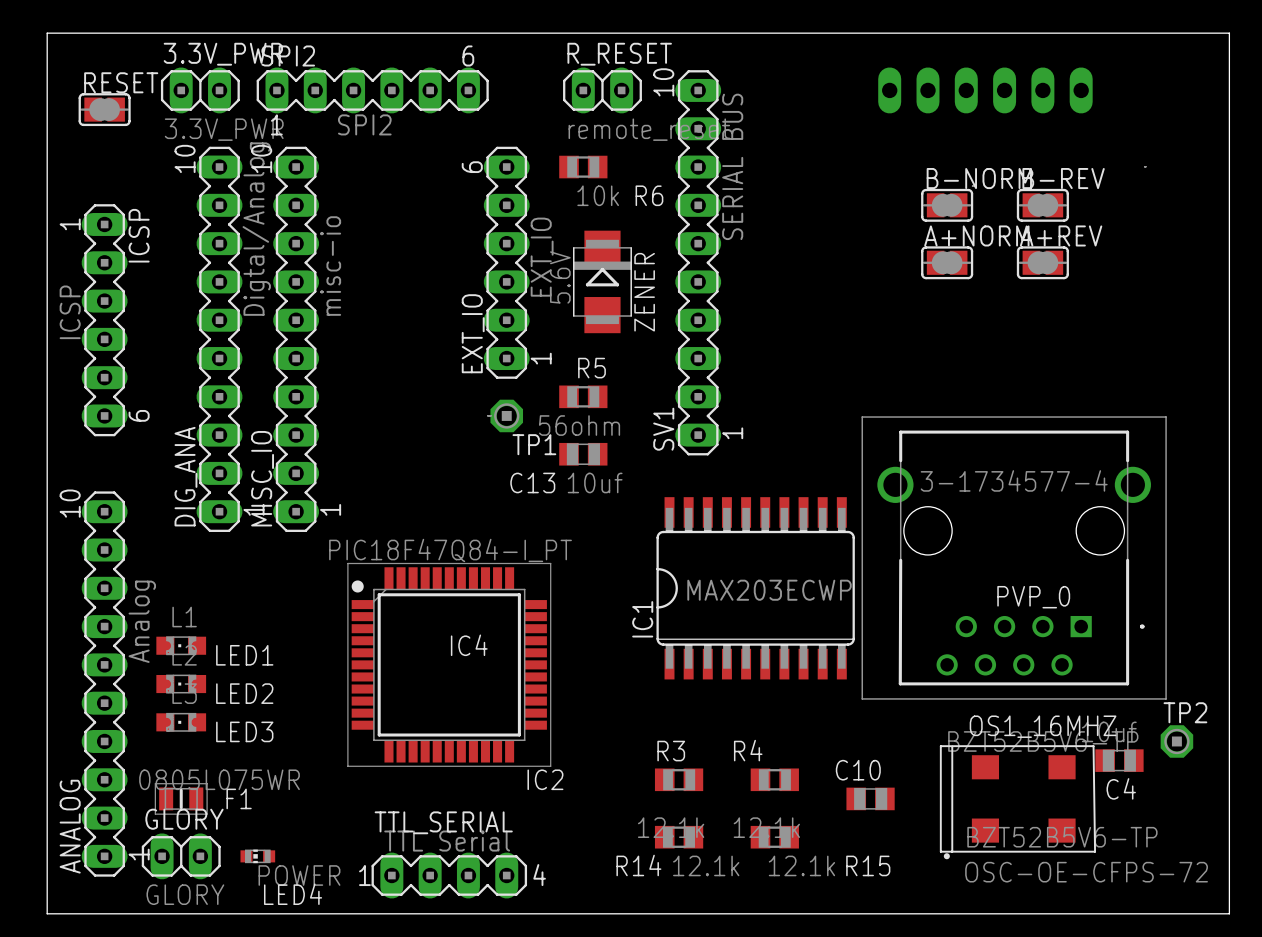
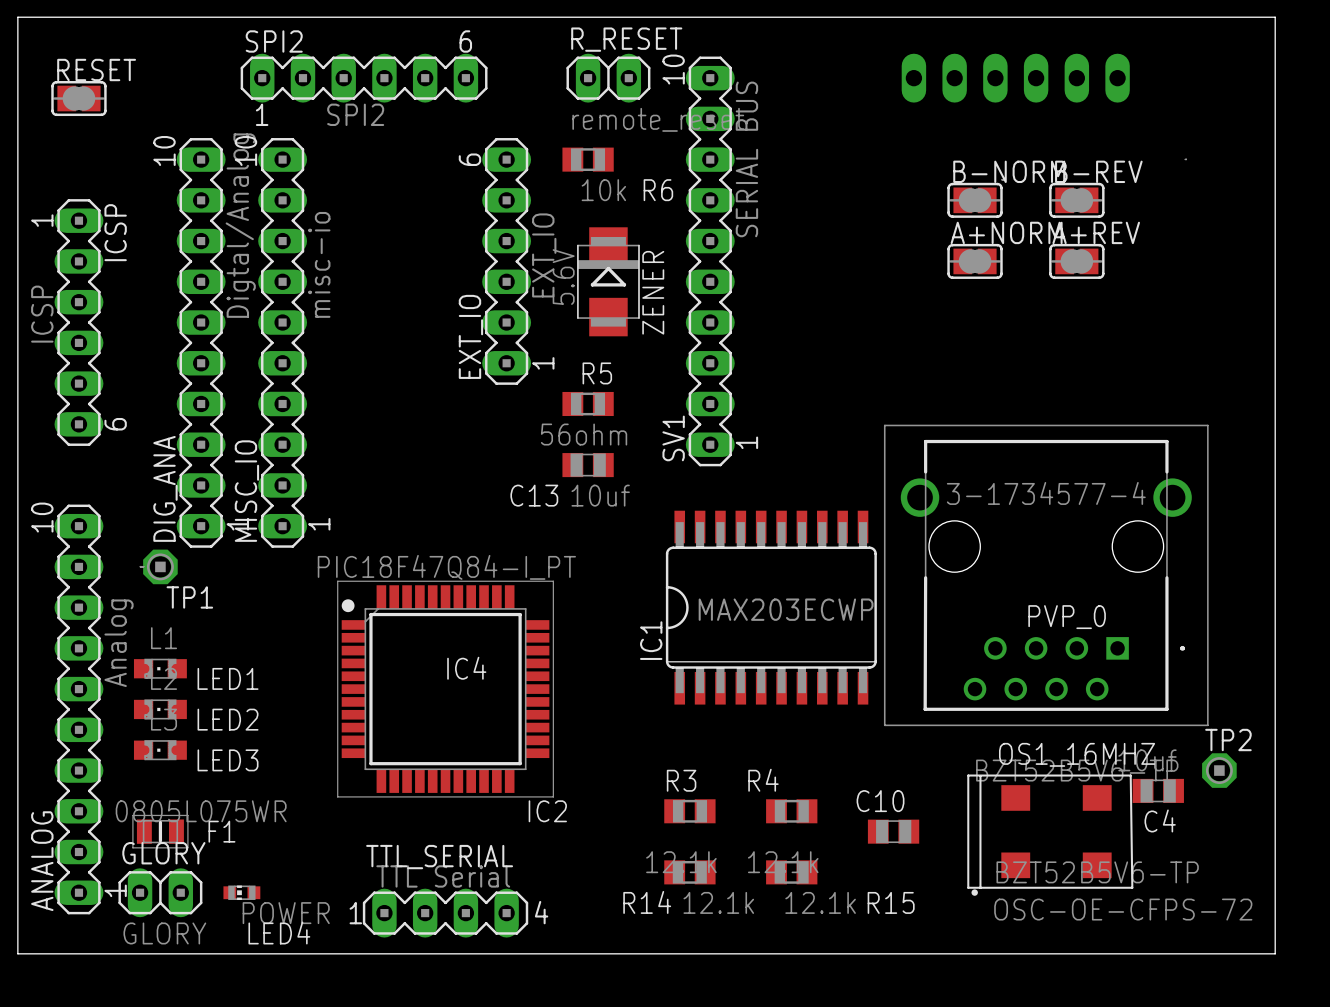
3.3V_PWR: 3.3V_PWR (200, 90) -> none
TP1 position: (506, 415) -> (160, 566)

